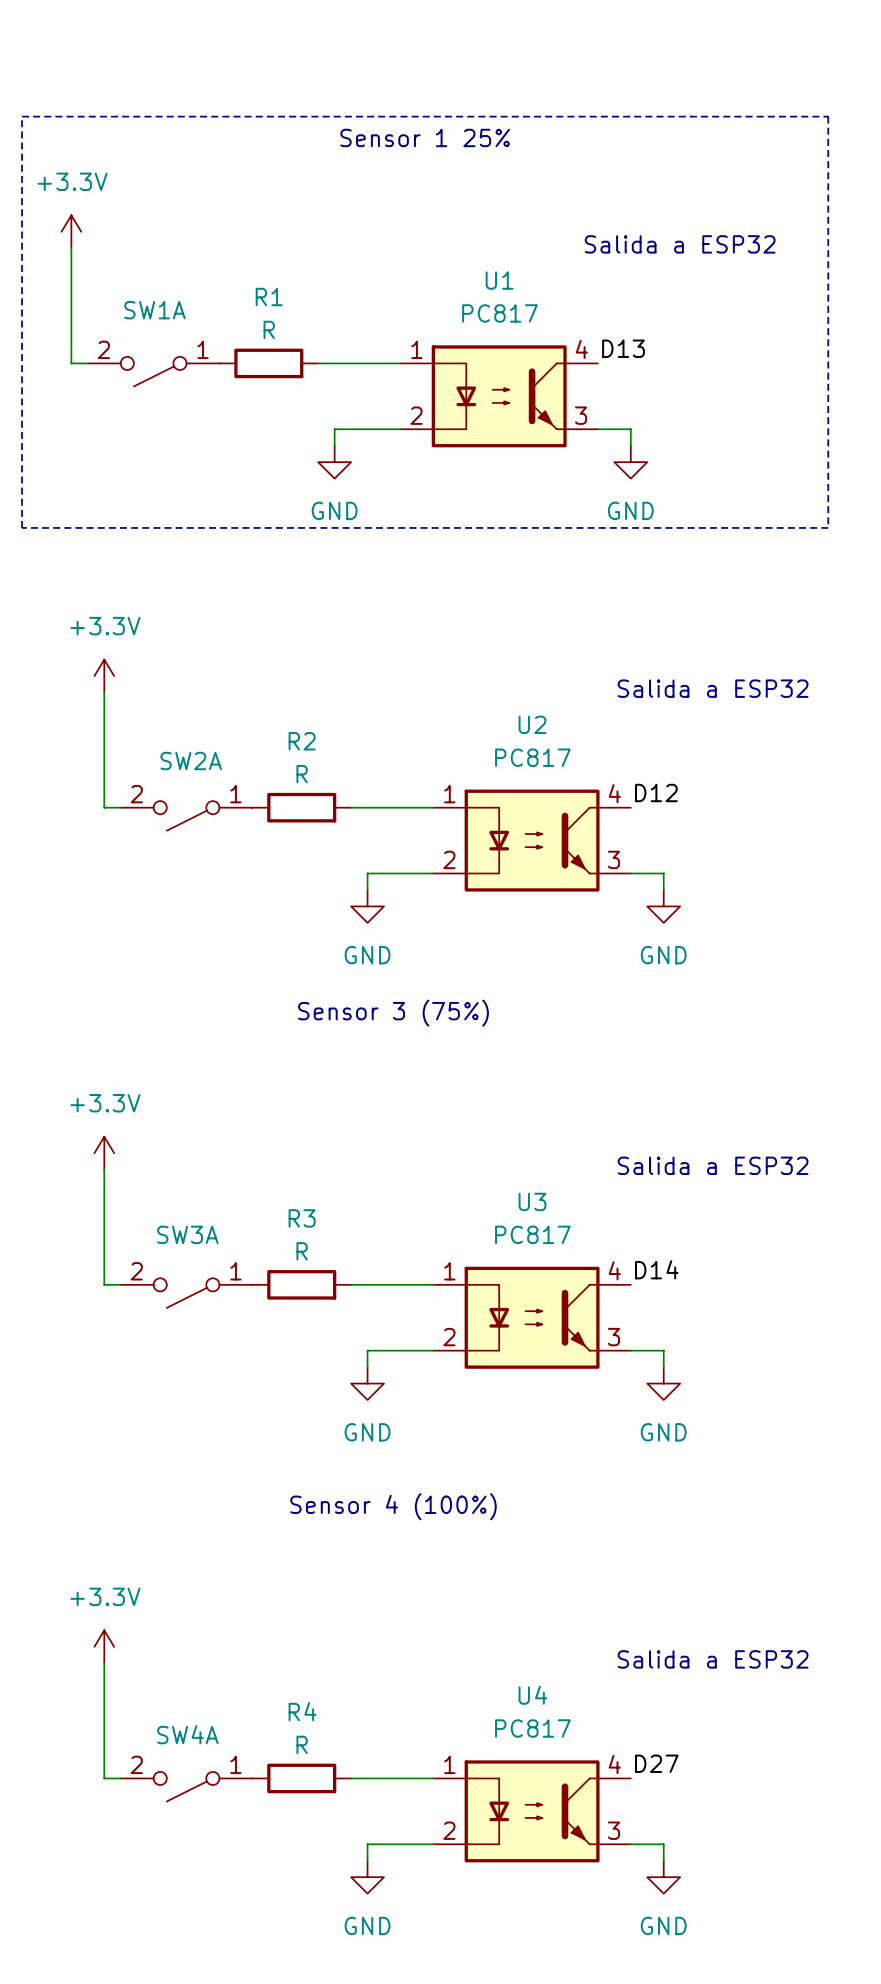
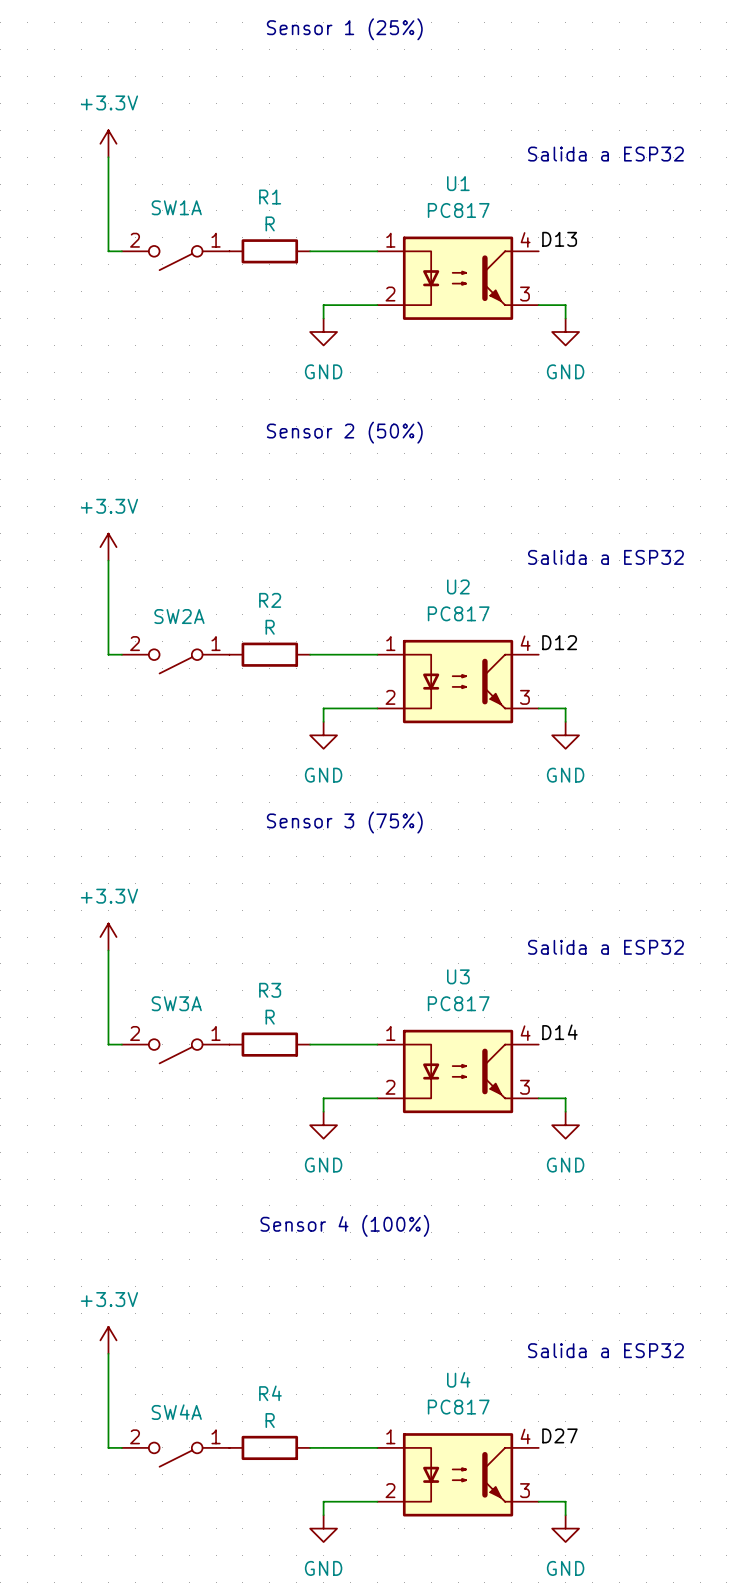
text: none -> Sensor 1 (25%) (344, 29)
line: (22, 116) (828, 116) (828, 527) (22, 527) (22, 116) -> none
text: Sensor 1 25% (425, 137) -> none
power symbol position: +3.3V (71, 231) -> +3.3V (108, 143)
text position: Salida a ESP32 (680, 244) -> Salida a ESP32 (605, 154)
wire: (71, 248) (71, 363) (87, 363) -> (108, 157) (108, 251) (121, 251)
label position: D13 (623, 348) -> D13 (559, 239)
R1 position: (268, 363) -> (269, 251)
wire: (318, 363) (400, 363) -> (310, 251) (377, 251)
SW1A position: (153, 371) -> (175, 258)
U1 position: (499, 396) -> (458, 278)
wire: (400, 429) (334, 429) (334, 445) -> (377, 305) (323, 305) (323, 318)
wire: (597, 429) (630, 429) (630, 445) -> (538, 305) (565, 305) (565, 318)
power symbol position: GND (334, 462) -> GND (323, 332)
power symbol position: GND (630, 462) -> GND (565, 332)
text: none -> Sensor 2 (50%) (344, 432)

